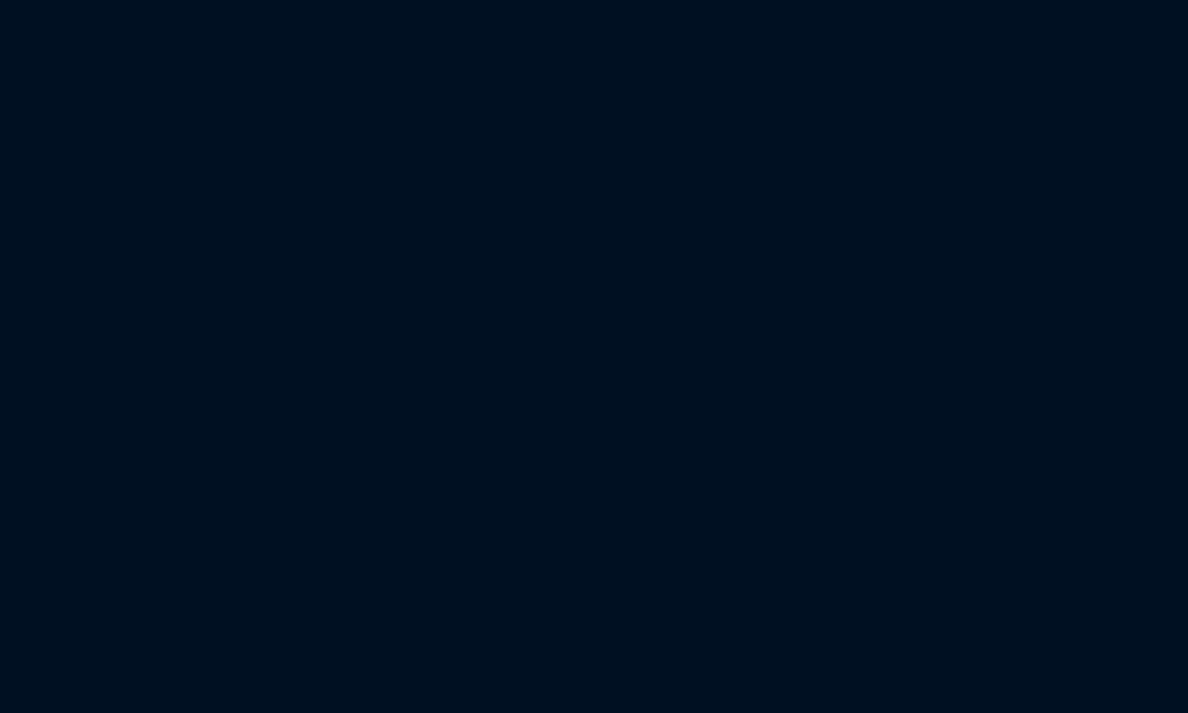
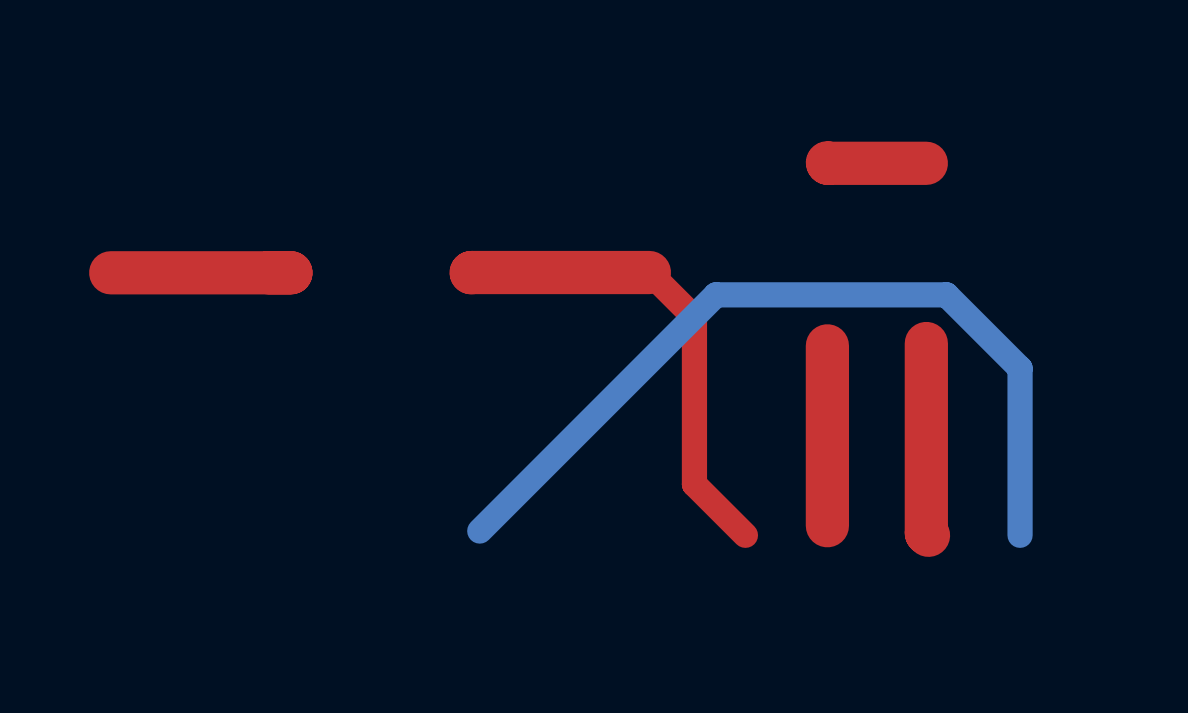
top track: none -> (827, 162) (926, 163)
top track: none -> (290, 272) (110, 272)
top track: none -> (471, 272) (649, 272) (694, 317) (694, 484) (745, 535)
top track: none -> (926, 343) (926, 533) (928, 535)
top track: none -> (827, 345) (827, 525)
bottom track: none -> (479, 531) (715, 294) (946, 294) (1020, 368) (1020, 535)

